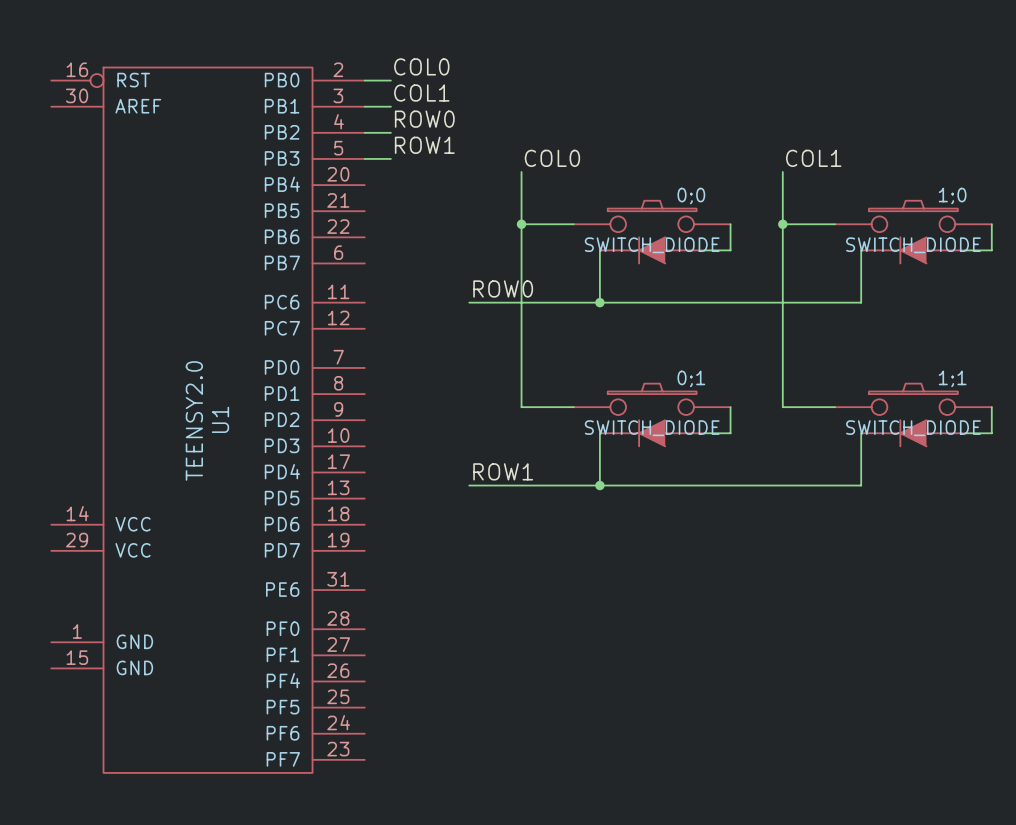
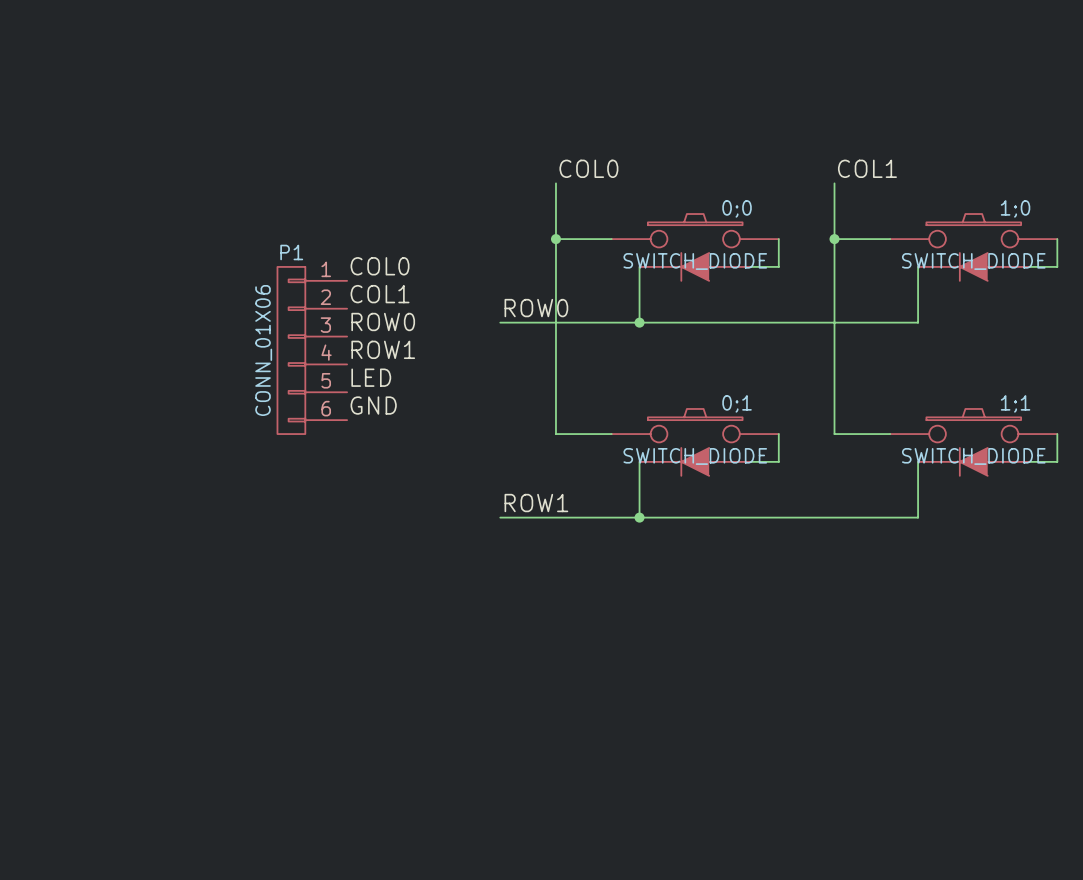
label position: COL0 (421, 66) -> COL0 (380, 266)
wire: (364, 80) (390, 80) -> none
label position: COL1 (421, 93) -> COL1 (380, 294)
wire: (364, 106) (390, 106) -> none
label position: ROW0 (424, 119) -> ROW0 (383, 321)
wire: (364, 132) (390, 132) -> none
label position: ROW1 (424, 145) -> ROW1 (383, 349)
wire: (364, 158) (390, 158) -> none
P1: none -> CONN_01X06 (312, 350)
label: none -> LED (371, 377)
label: none -> GND (373, 405)
U1: TEENSY2.0 (208, 420) -> none

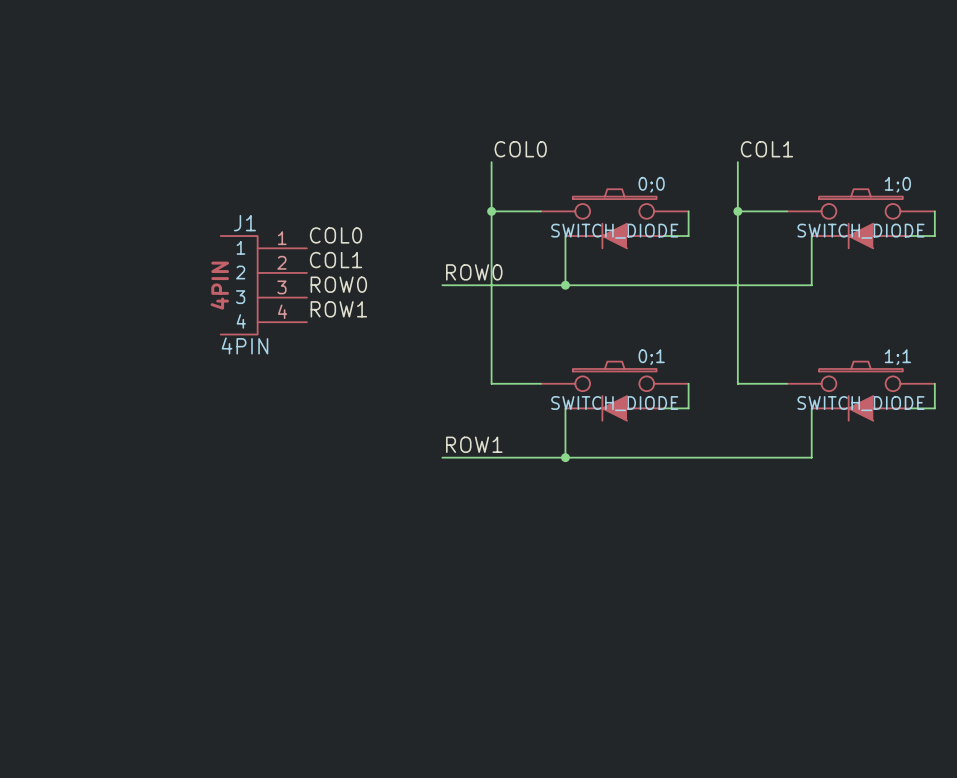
J1: none -> 4PIN (263, 285)
P1: CONN_01X06 (312, 350) -> none
label: LED (371, 377) -> none
label: GND (373, 405) -> none

